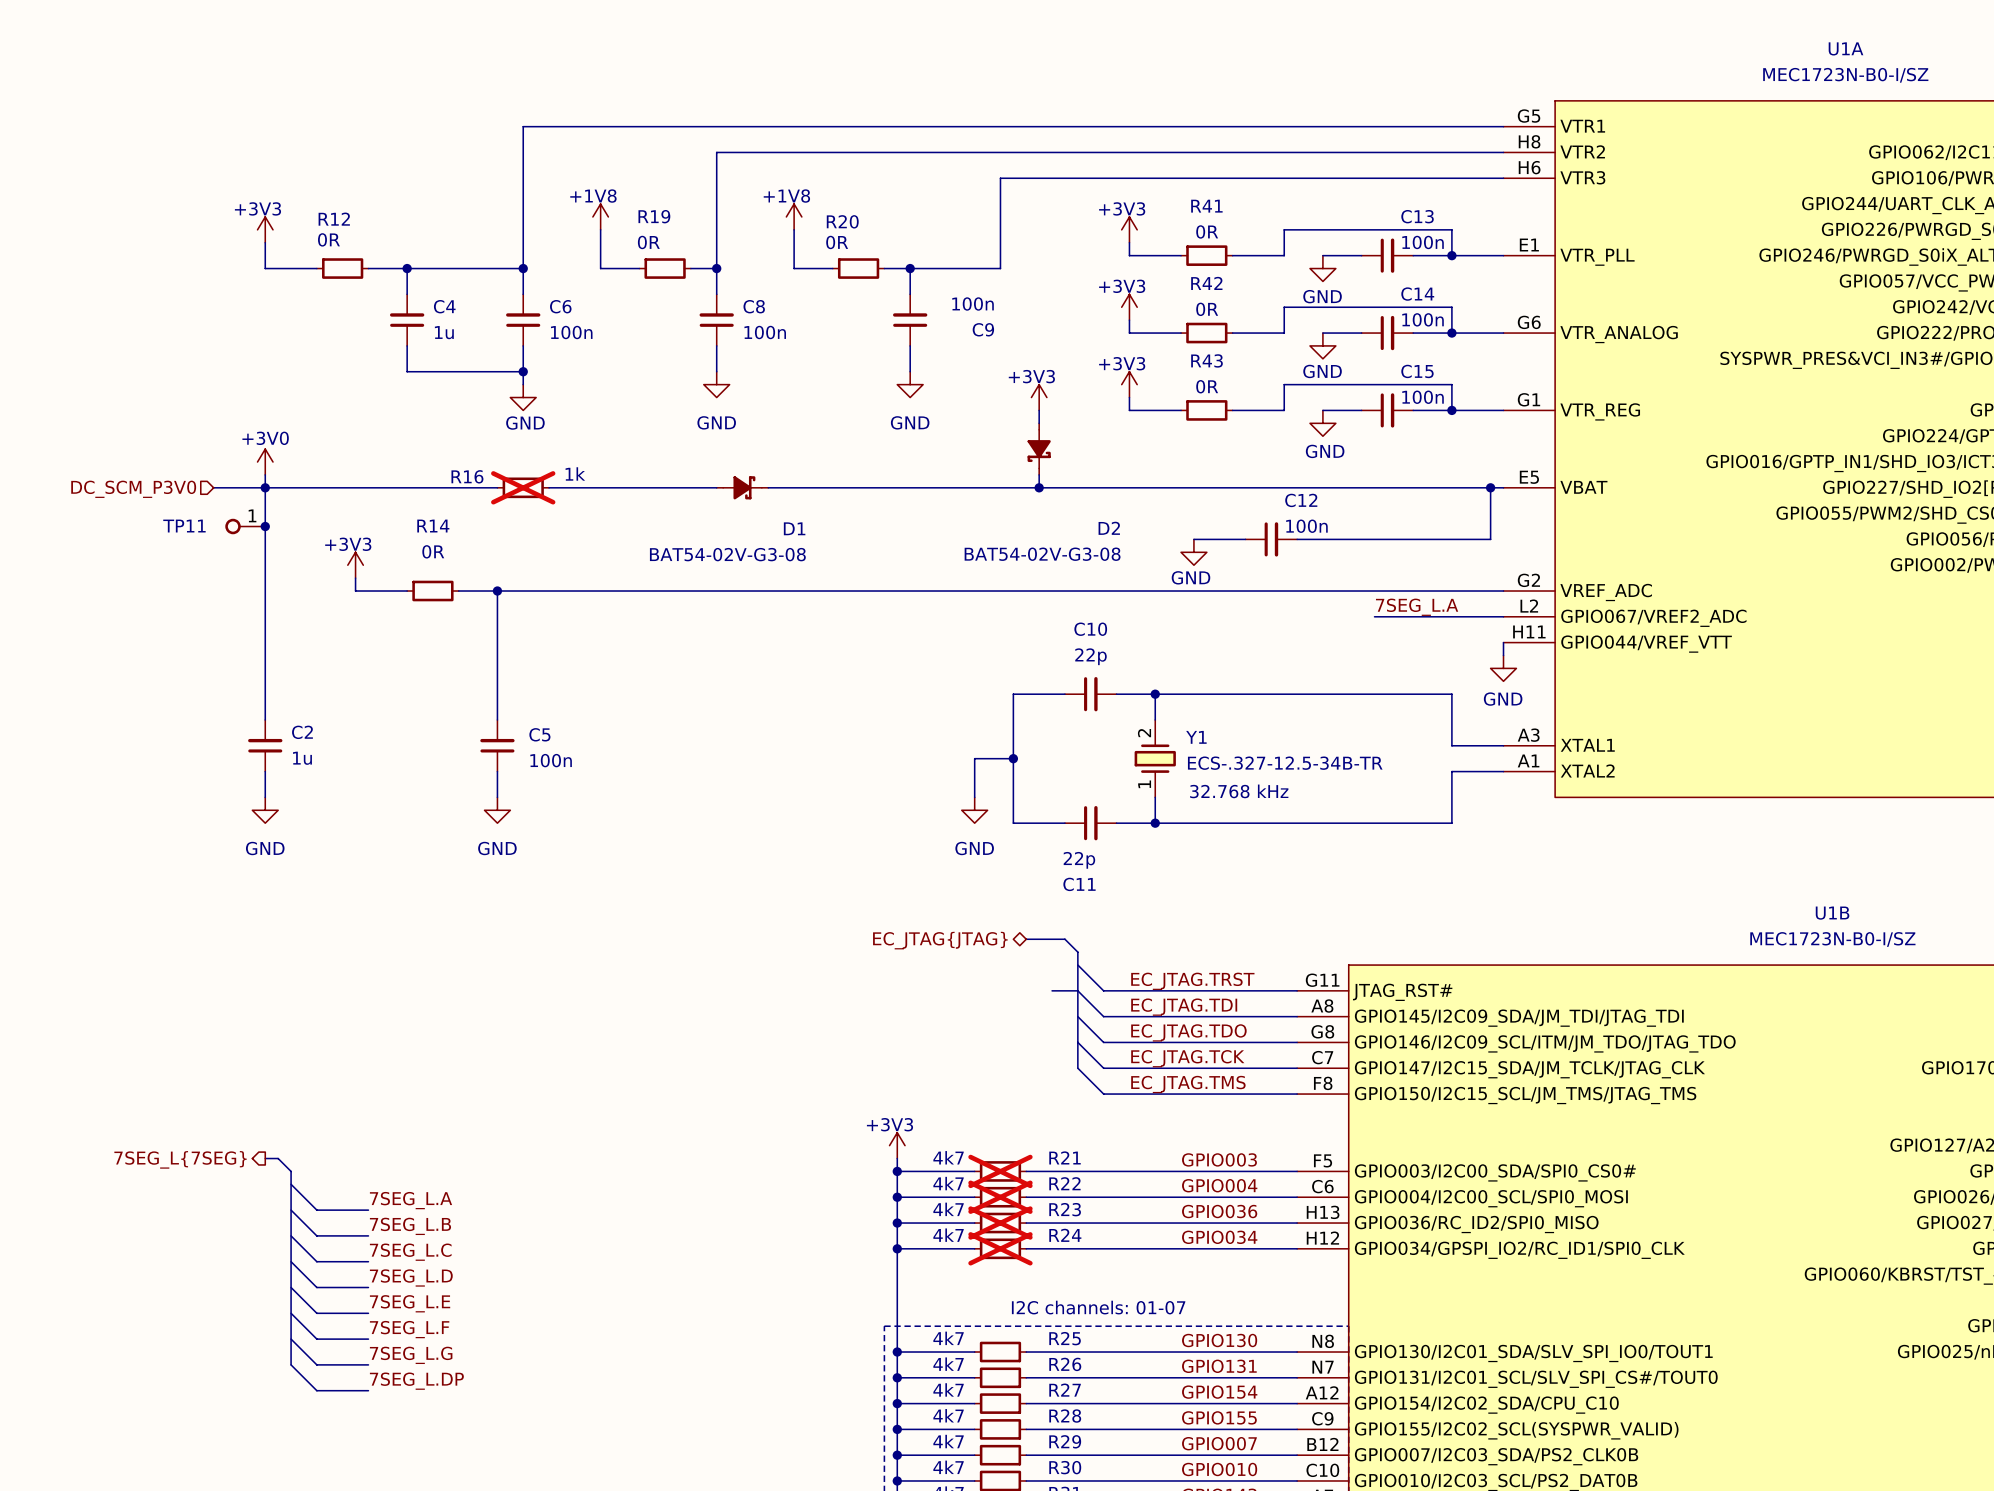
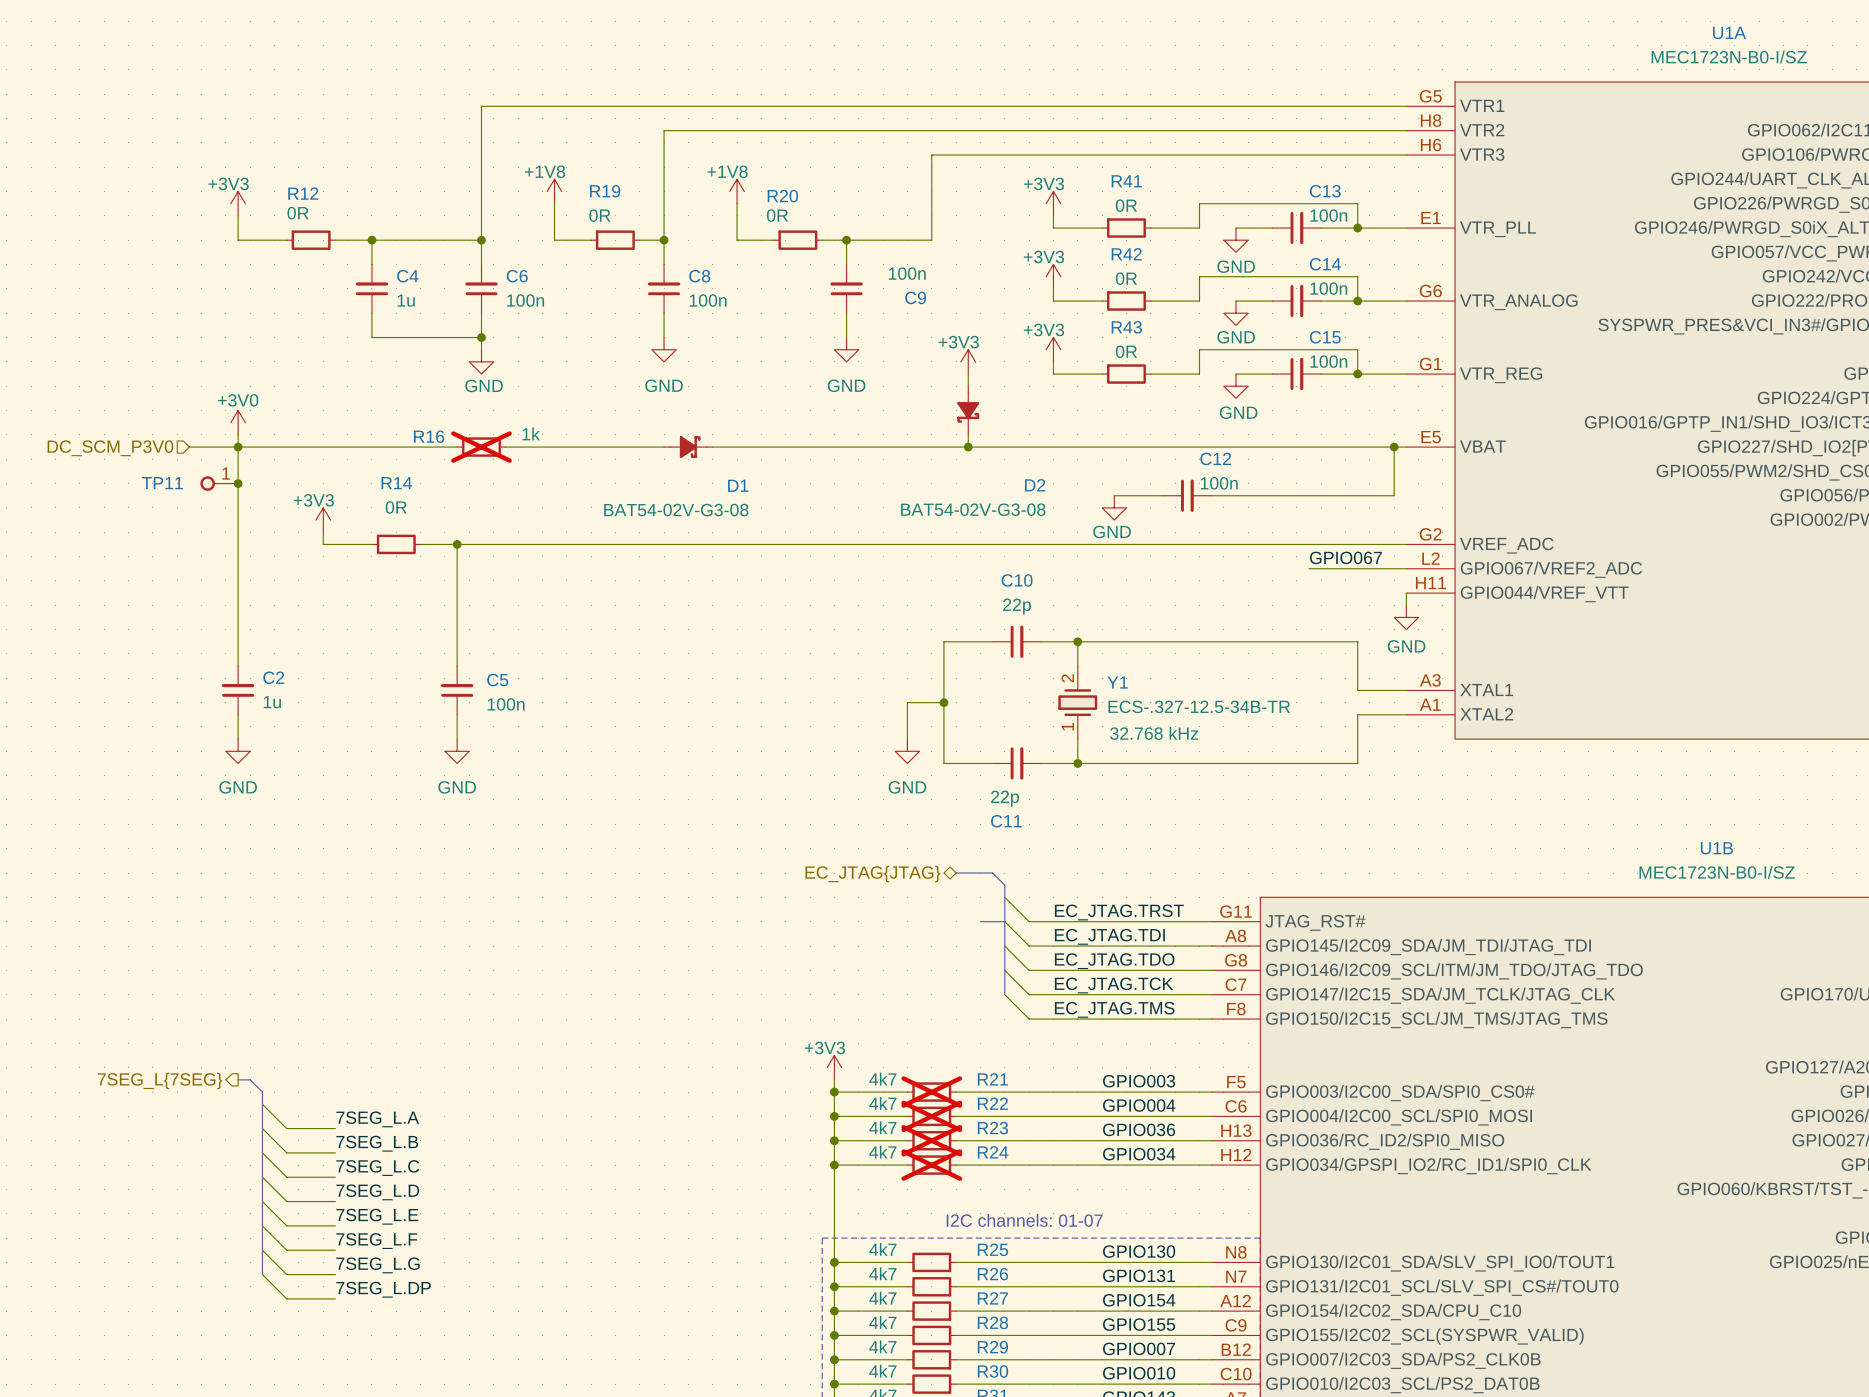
label: none -> GPIO067 (1345, 557)
label: 7SEG_L.A (1417, 607) -> none
wire: (1374, 616) (1400, 616) -> none

